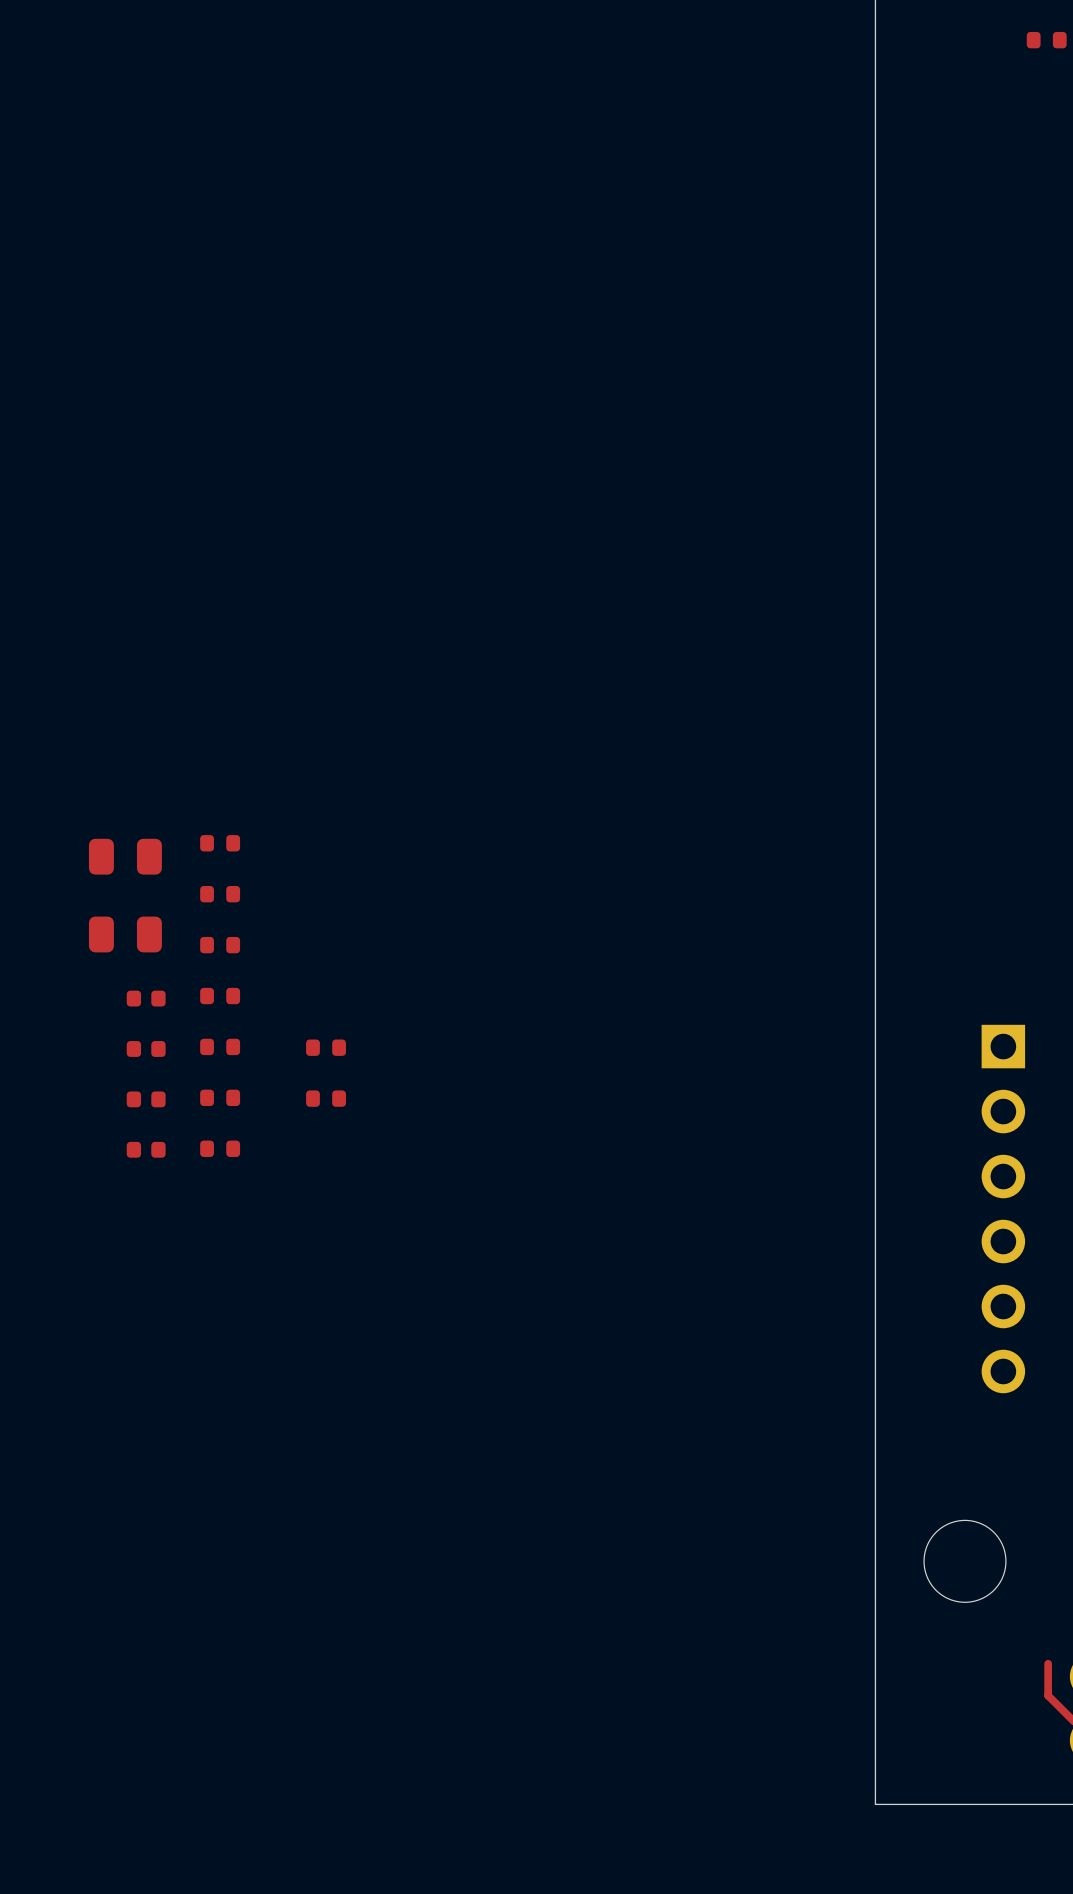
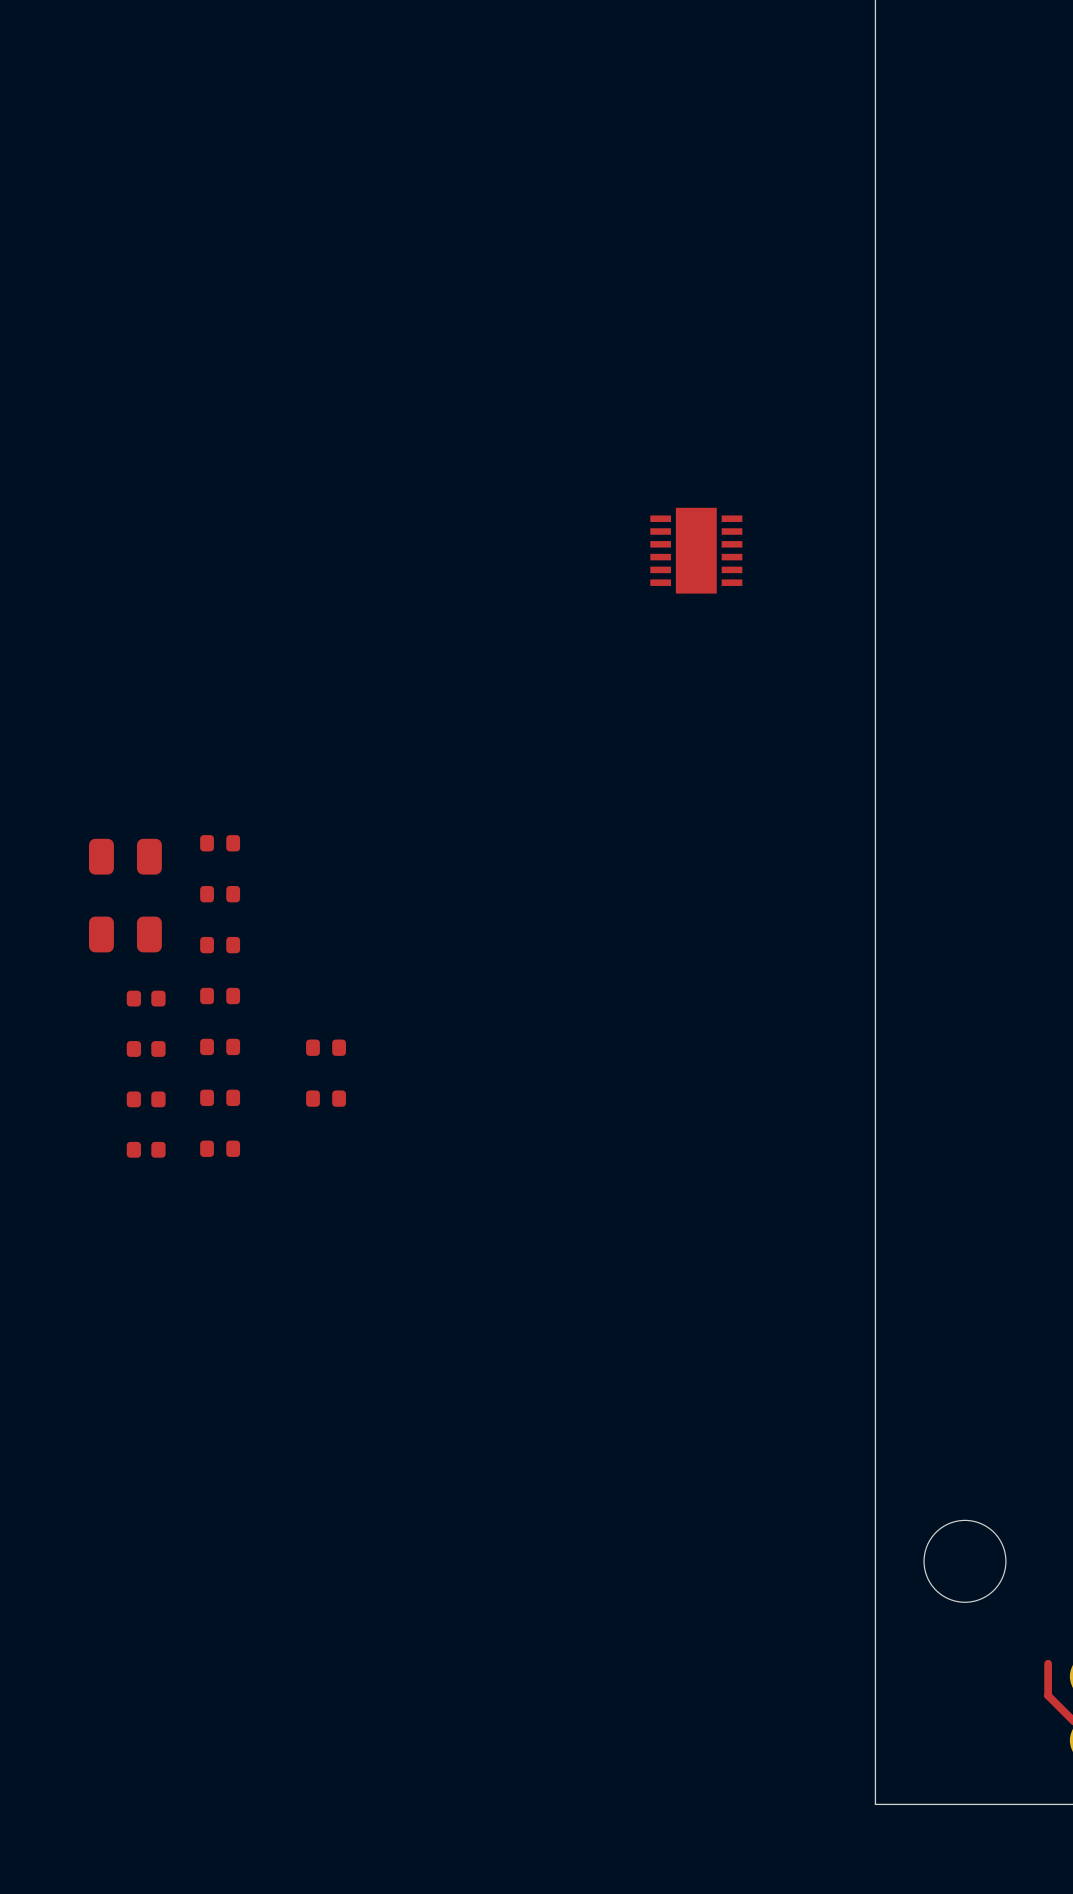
part: (1046, 40) -> none
part: none -> (696, 550)
part: (1003, 1209) -> none

